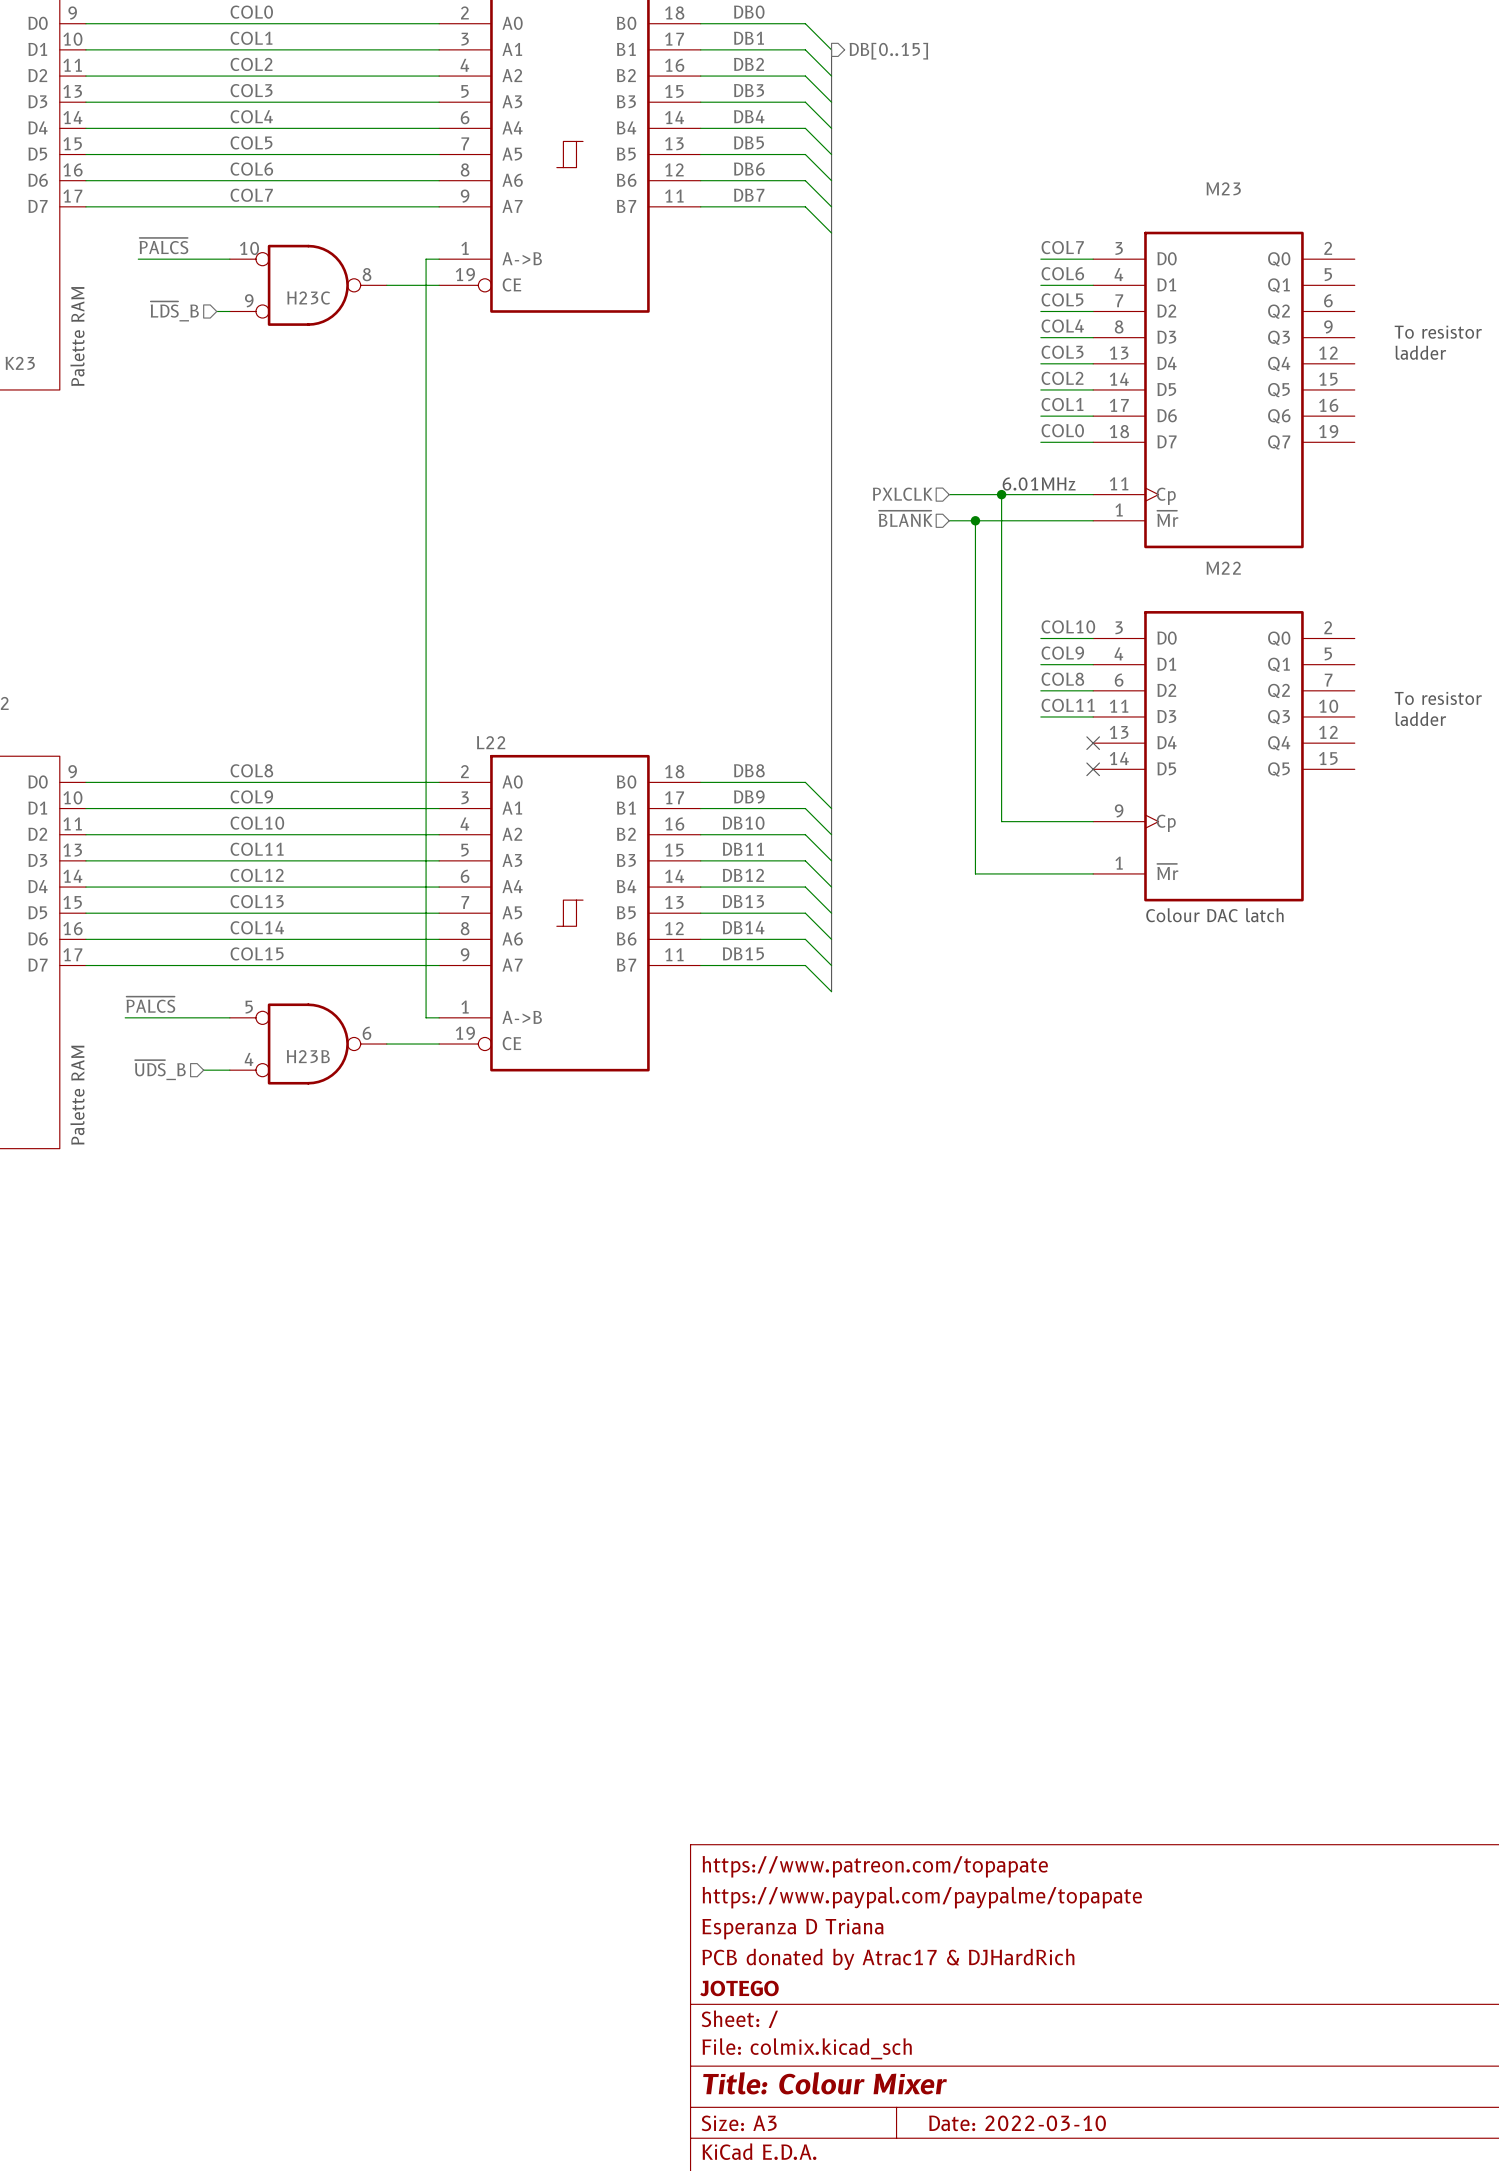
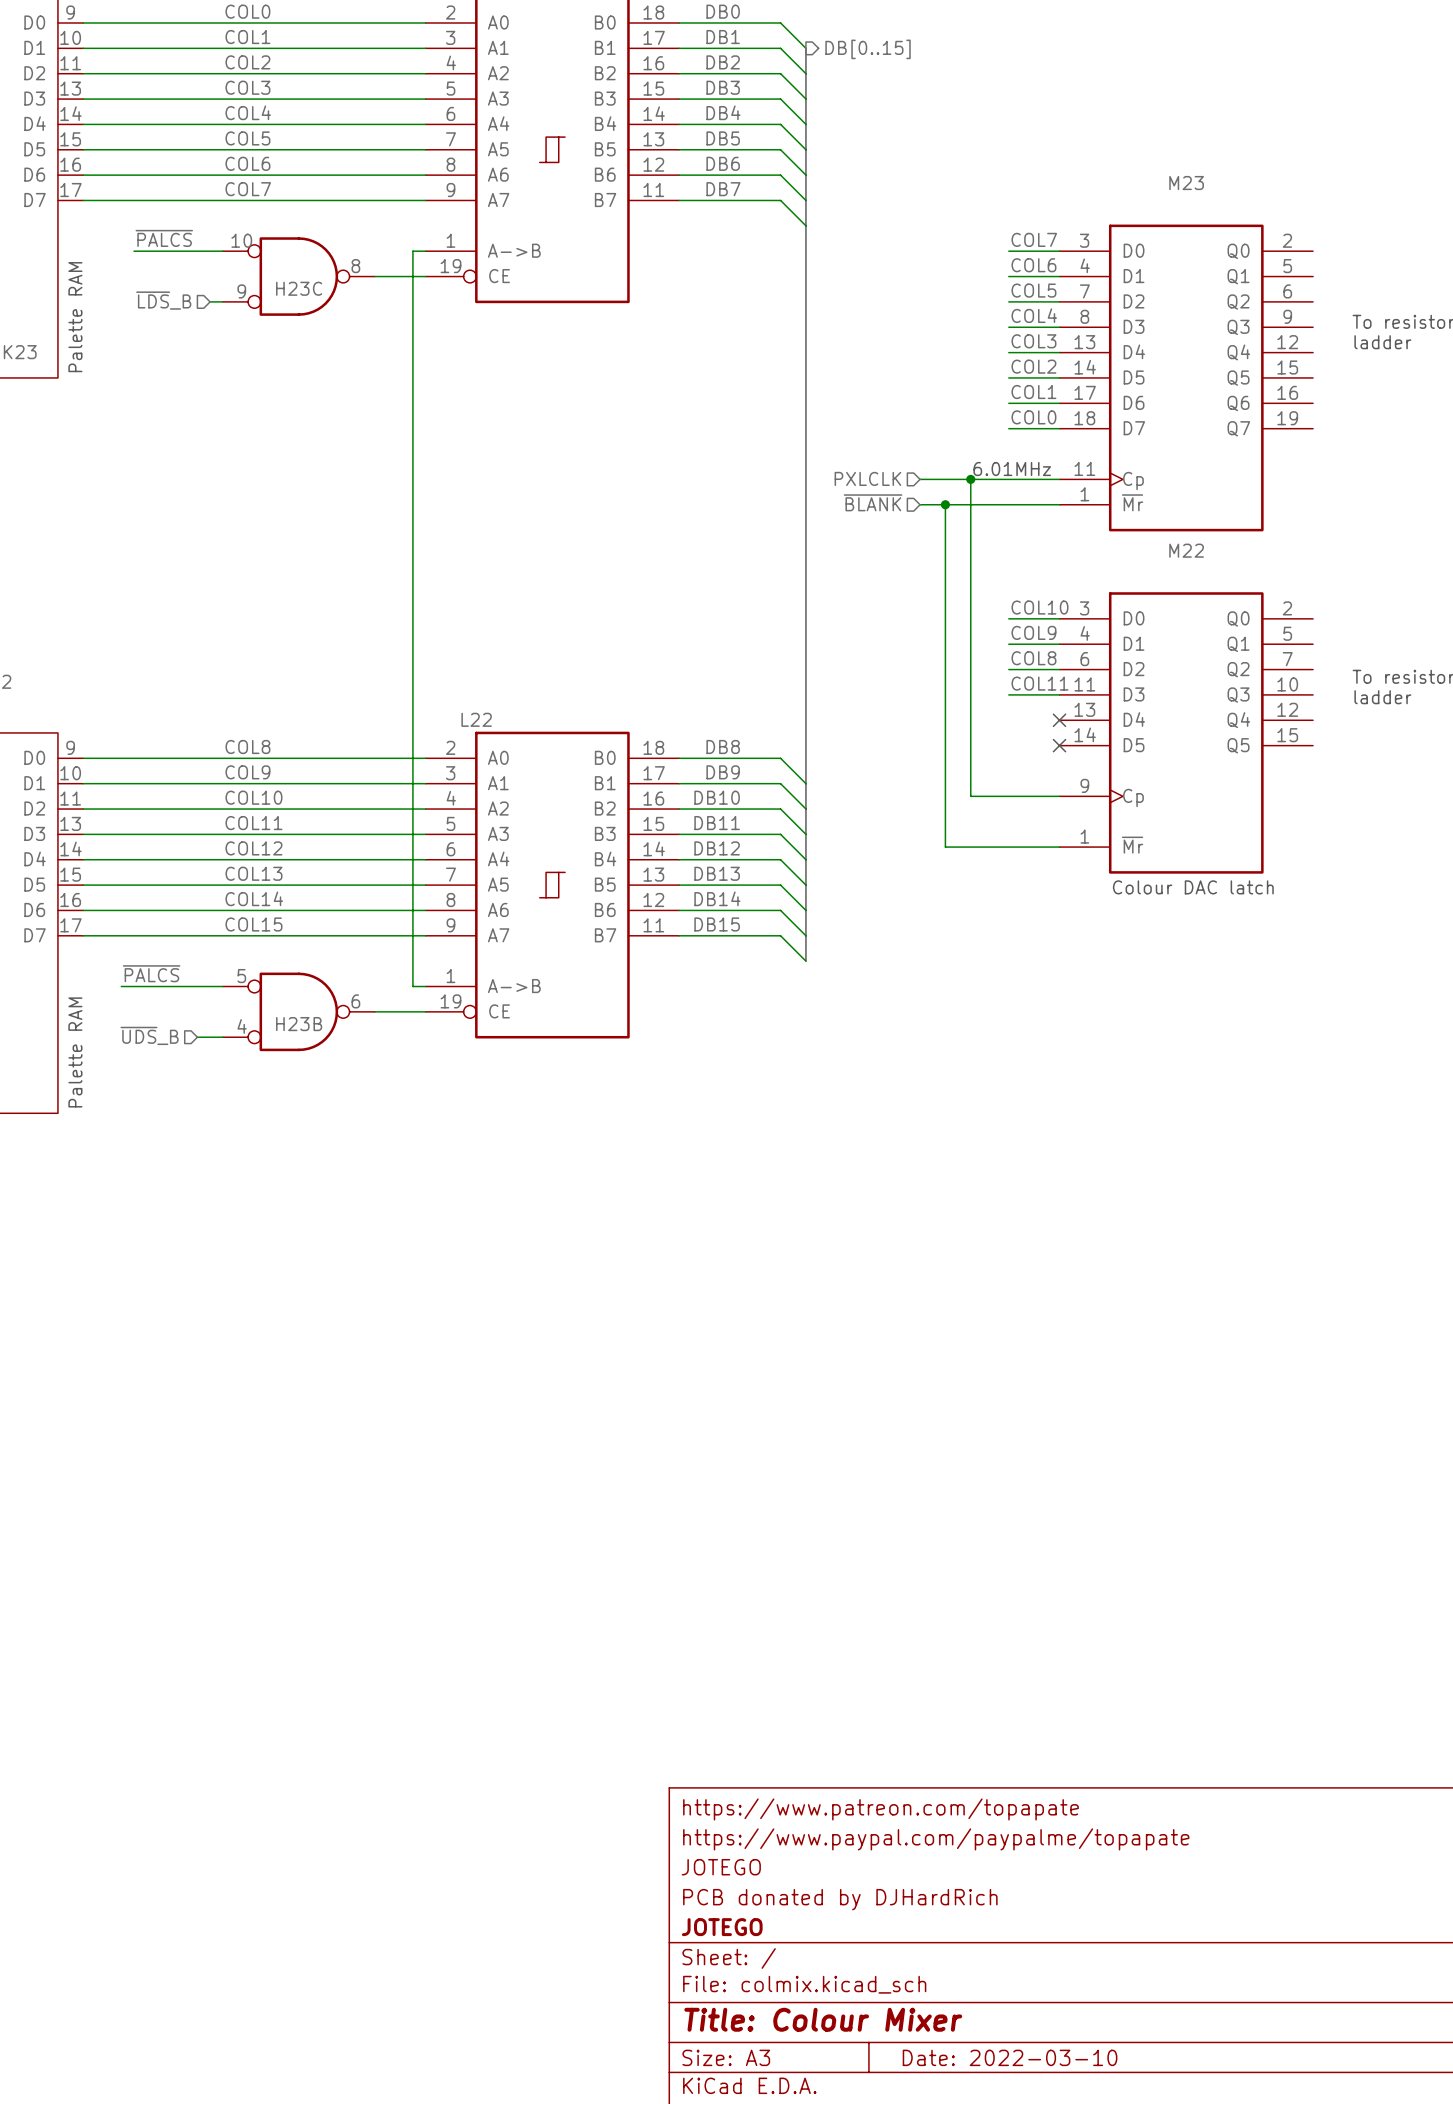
title block: Esperanza D Triana (792, 1929) -> JOTEGO (721, 1867)
title block: PCB donated by Atrac17 & DJHardRich (888, 1959) -> PCB donated by DJHardRich (840, 1899)

